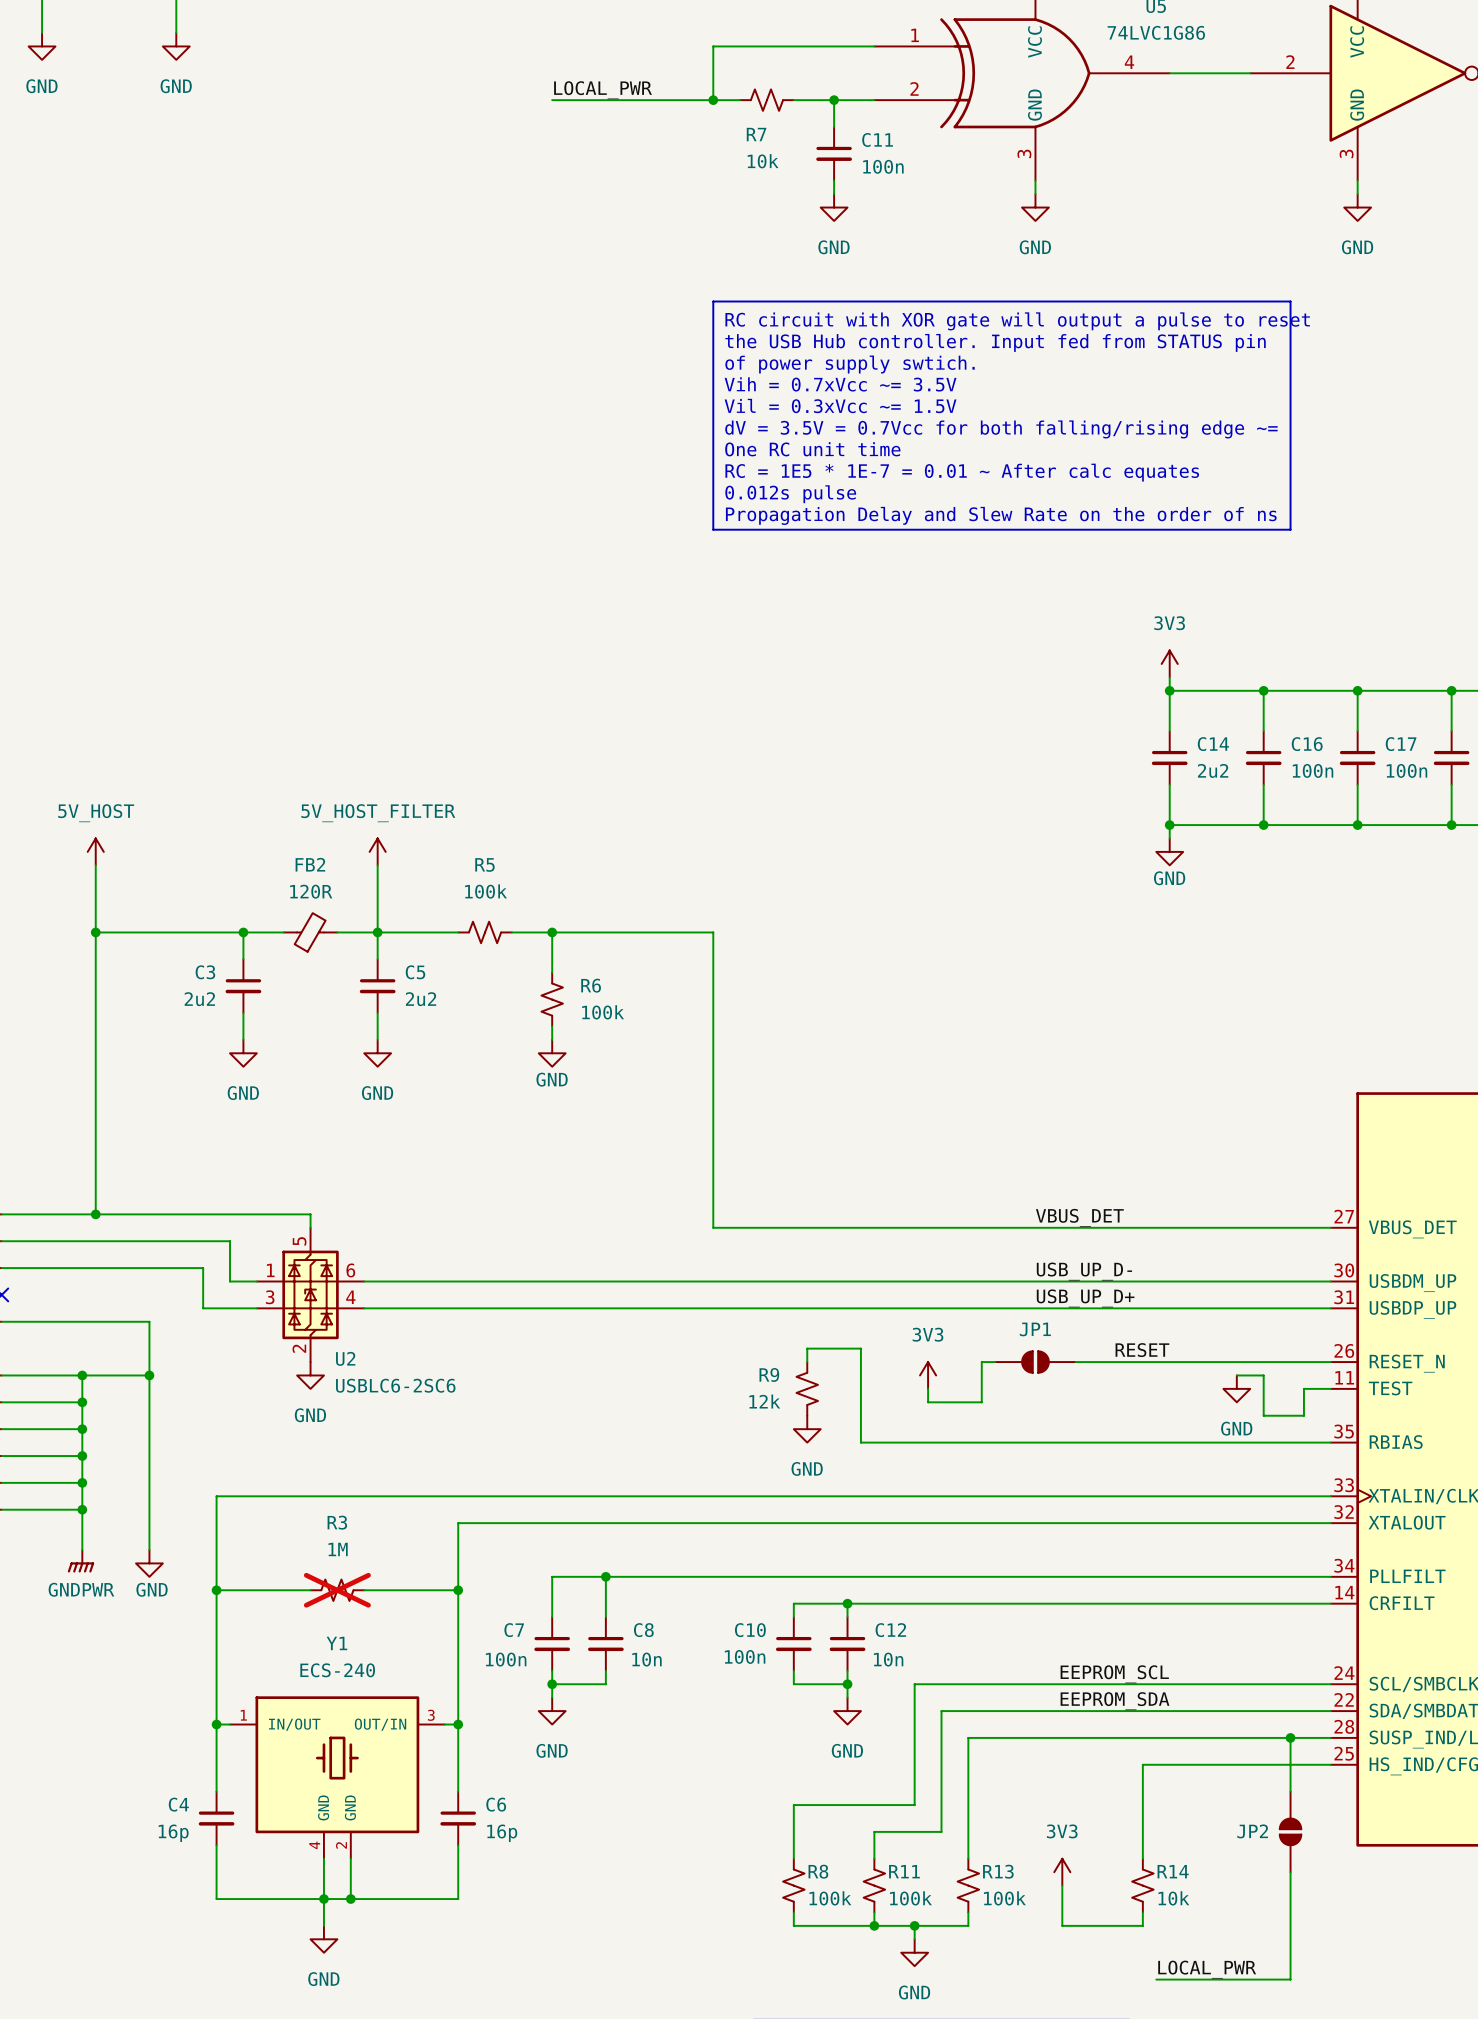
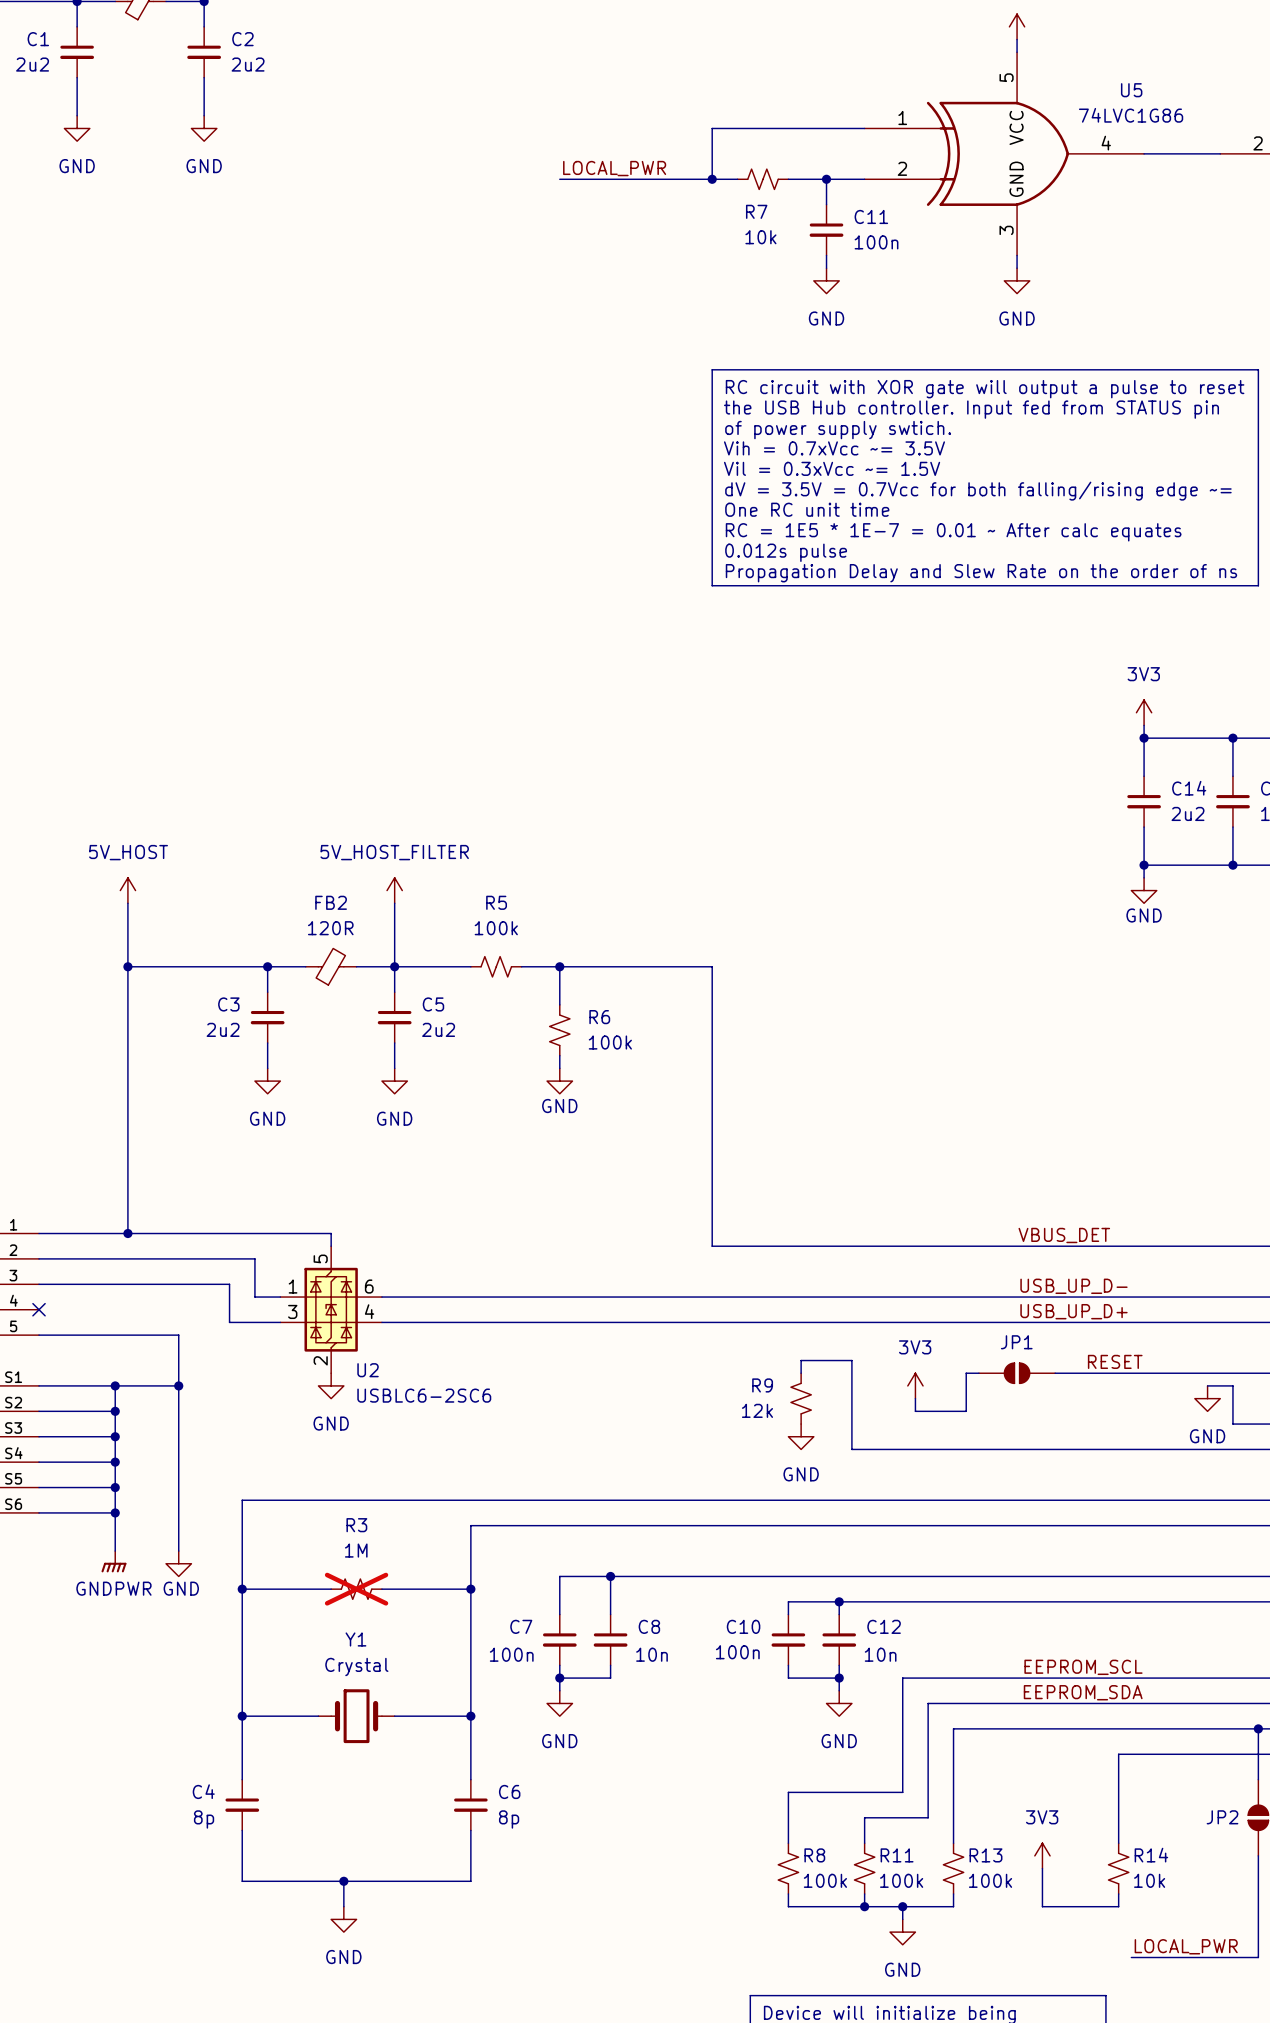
Y1 value: ECS-240 (337, 1670) -> Crystal (356, 1667)
Y1 symbol: [230, 1696, 445, 1859] -> [318, 1689, 395, 1744]
C4 value: 16p (173, 1833) -> 8p (204, 1819)
C6 value: 16p (502, 1833) -> 8p (509, 1819)
wire: (323, 1858) (323, 1899) -> none
wire: (350, 1858) (350, 1899) -> none
junction: (350, 1899) -> none

